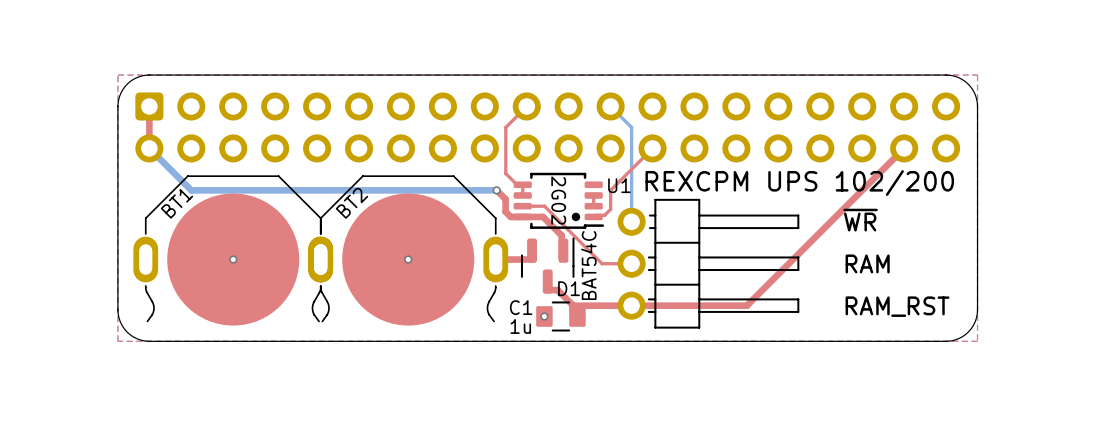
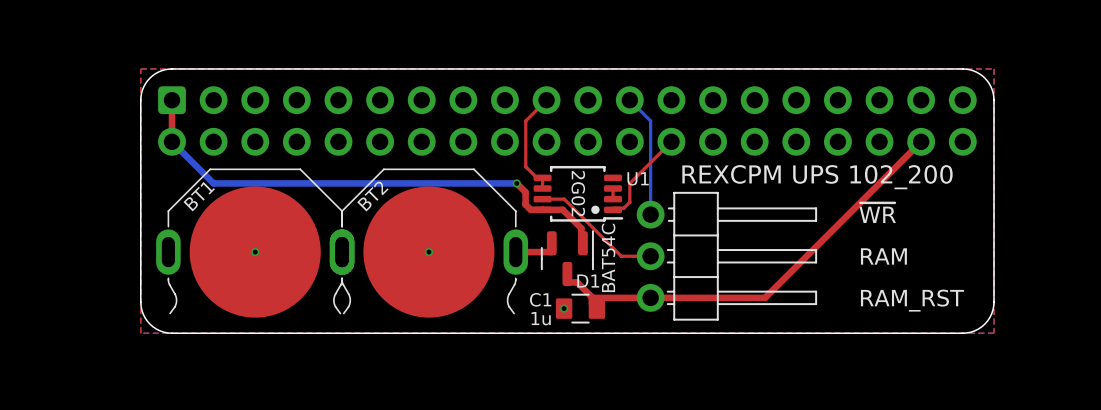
text: REXCPM UPS 102/200 (799, 183) -> REXCPM UPS 102_200 (817, 177)

